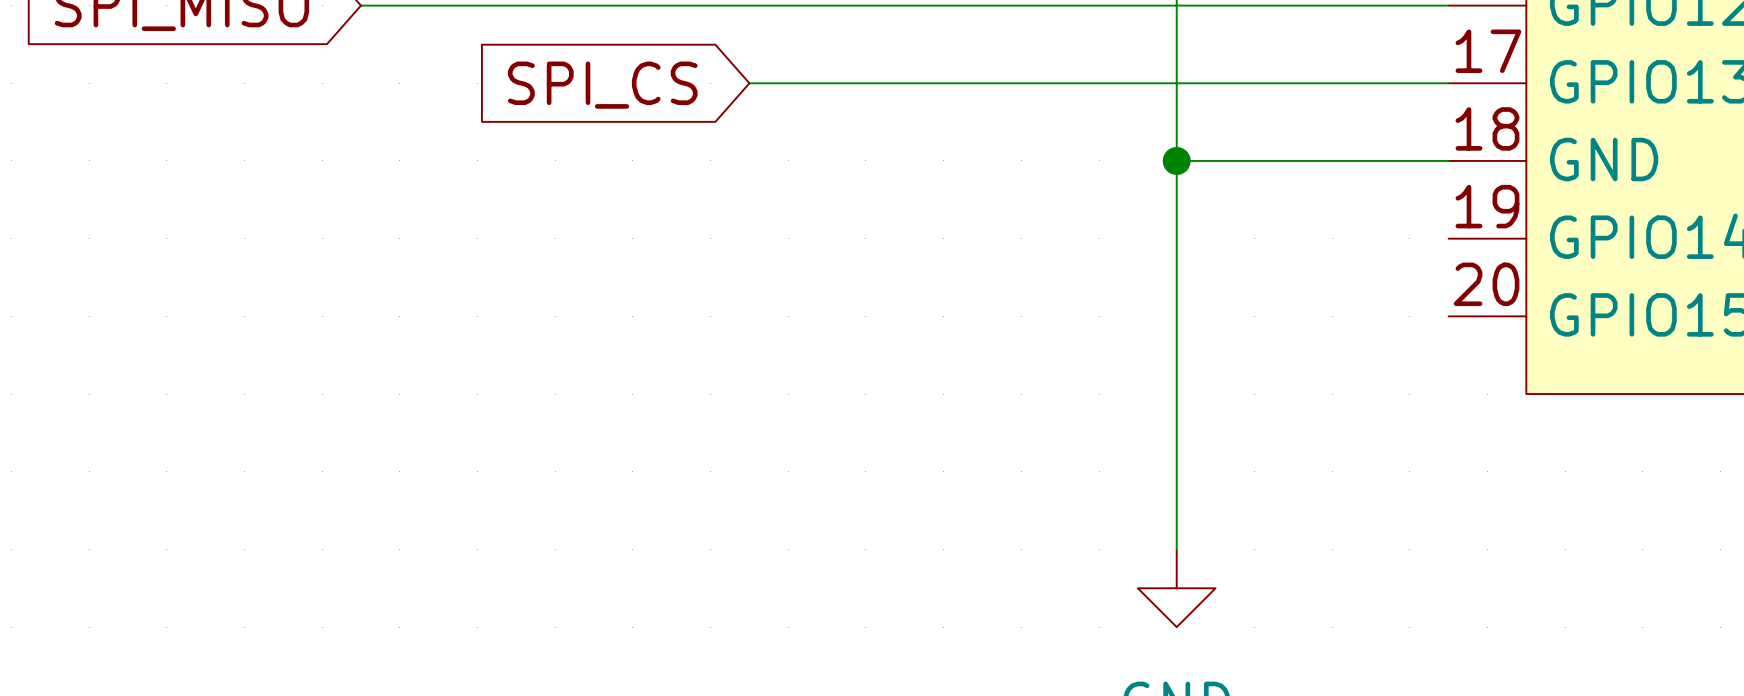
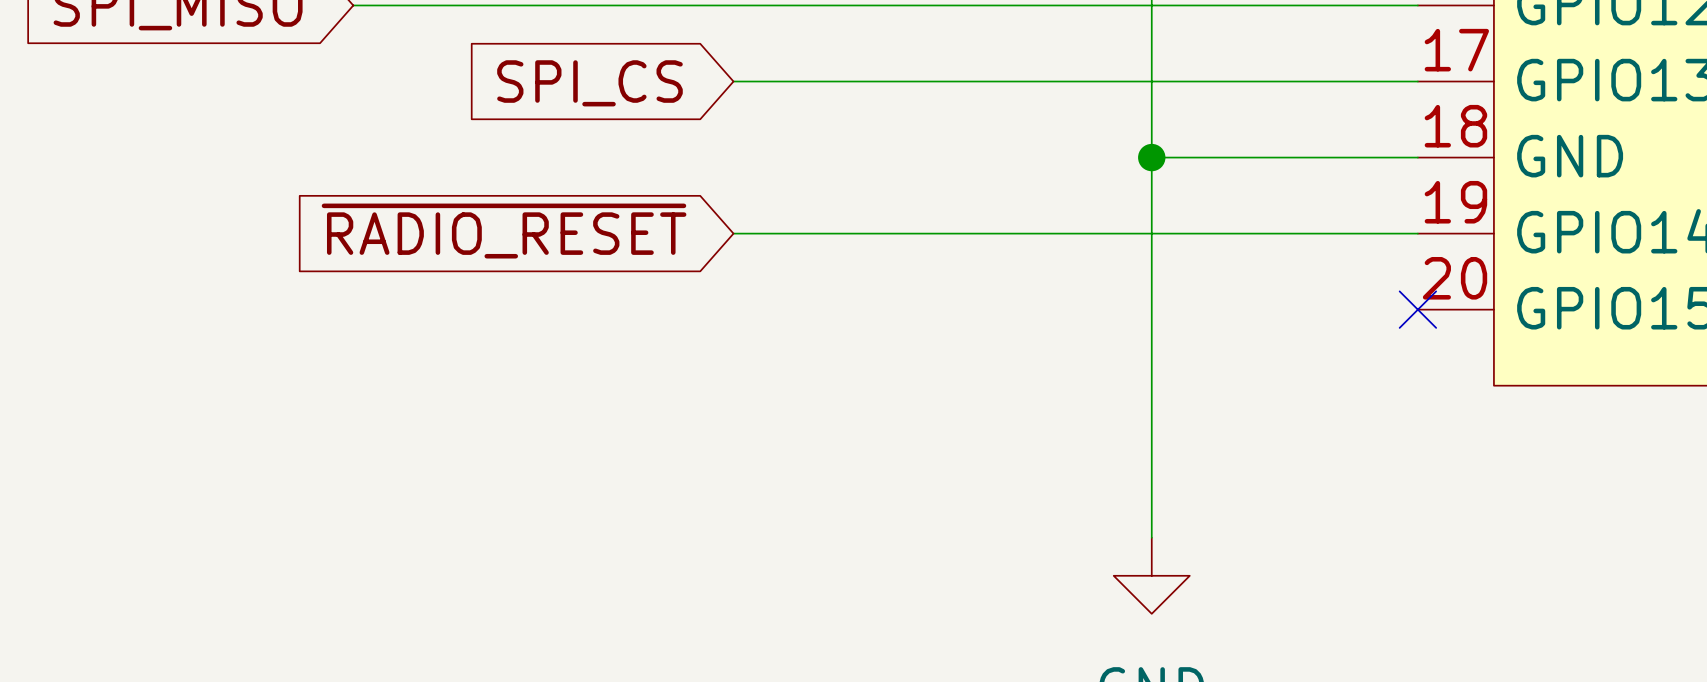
global label: none -> ~{RADIO_RESET} (504, 231)
wire: none -> (733, 233) (1417, 233)
no-connect mark: none -> (1417, 309)

